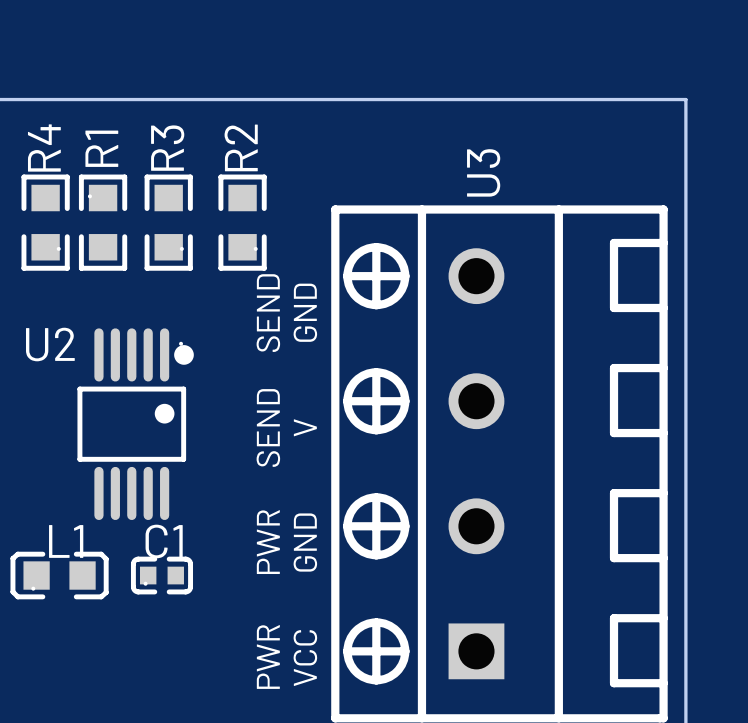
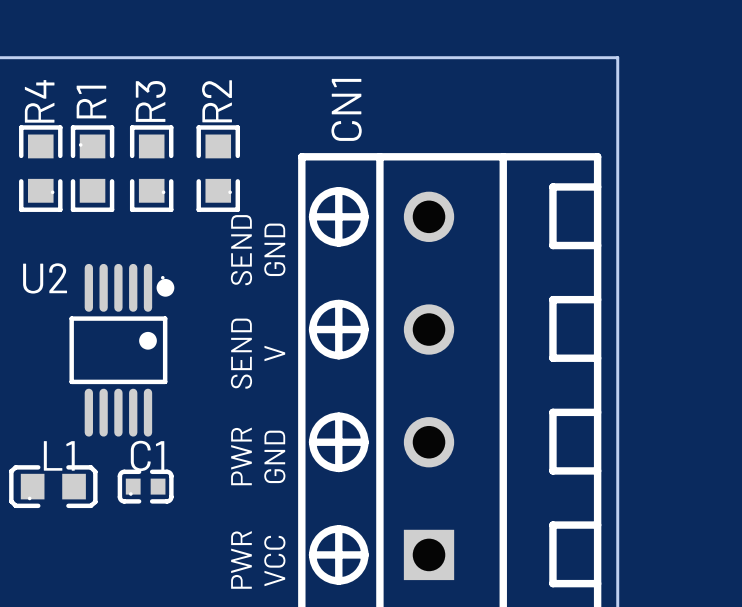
U3 name: U3 (483, 172) -> CN1 (346, 109)

